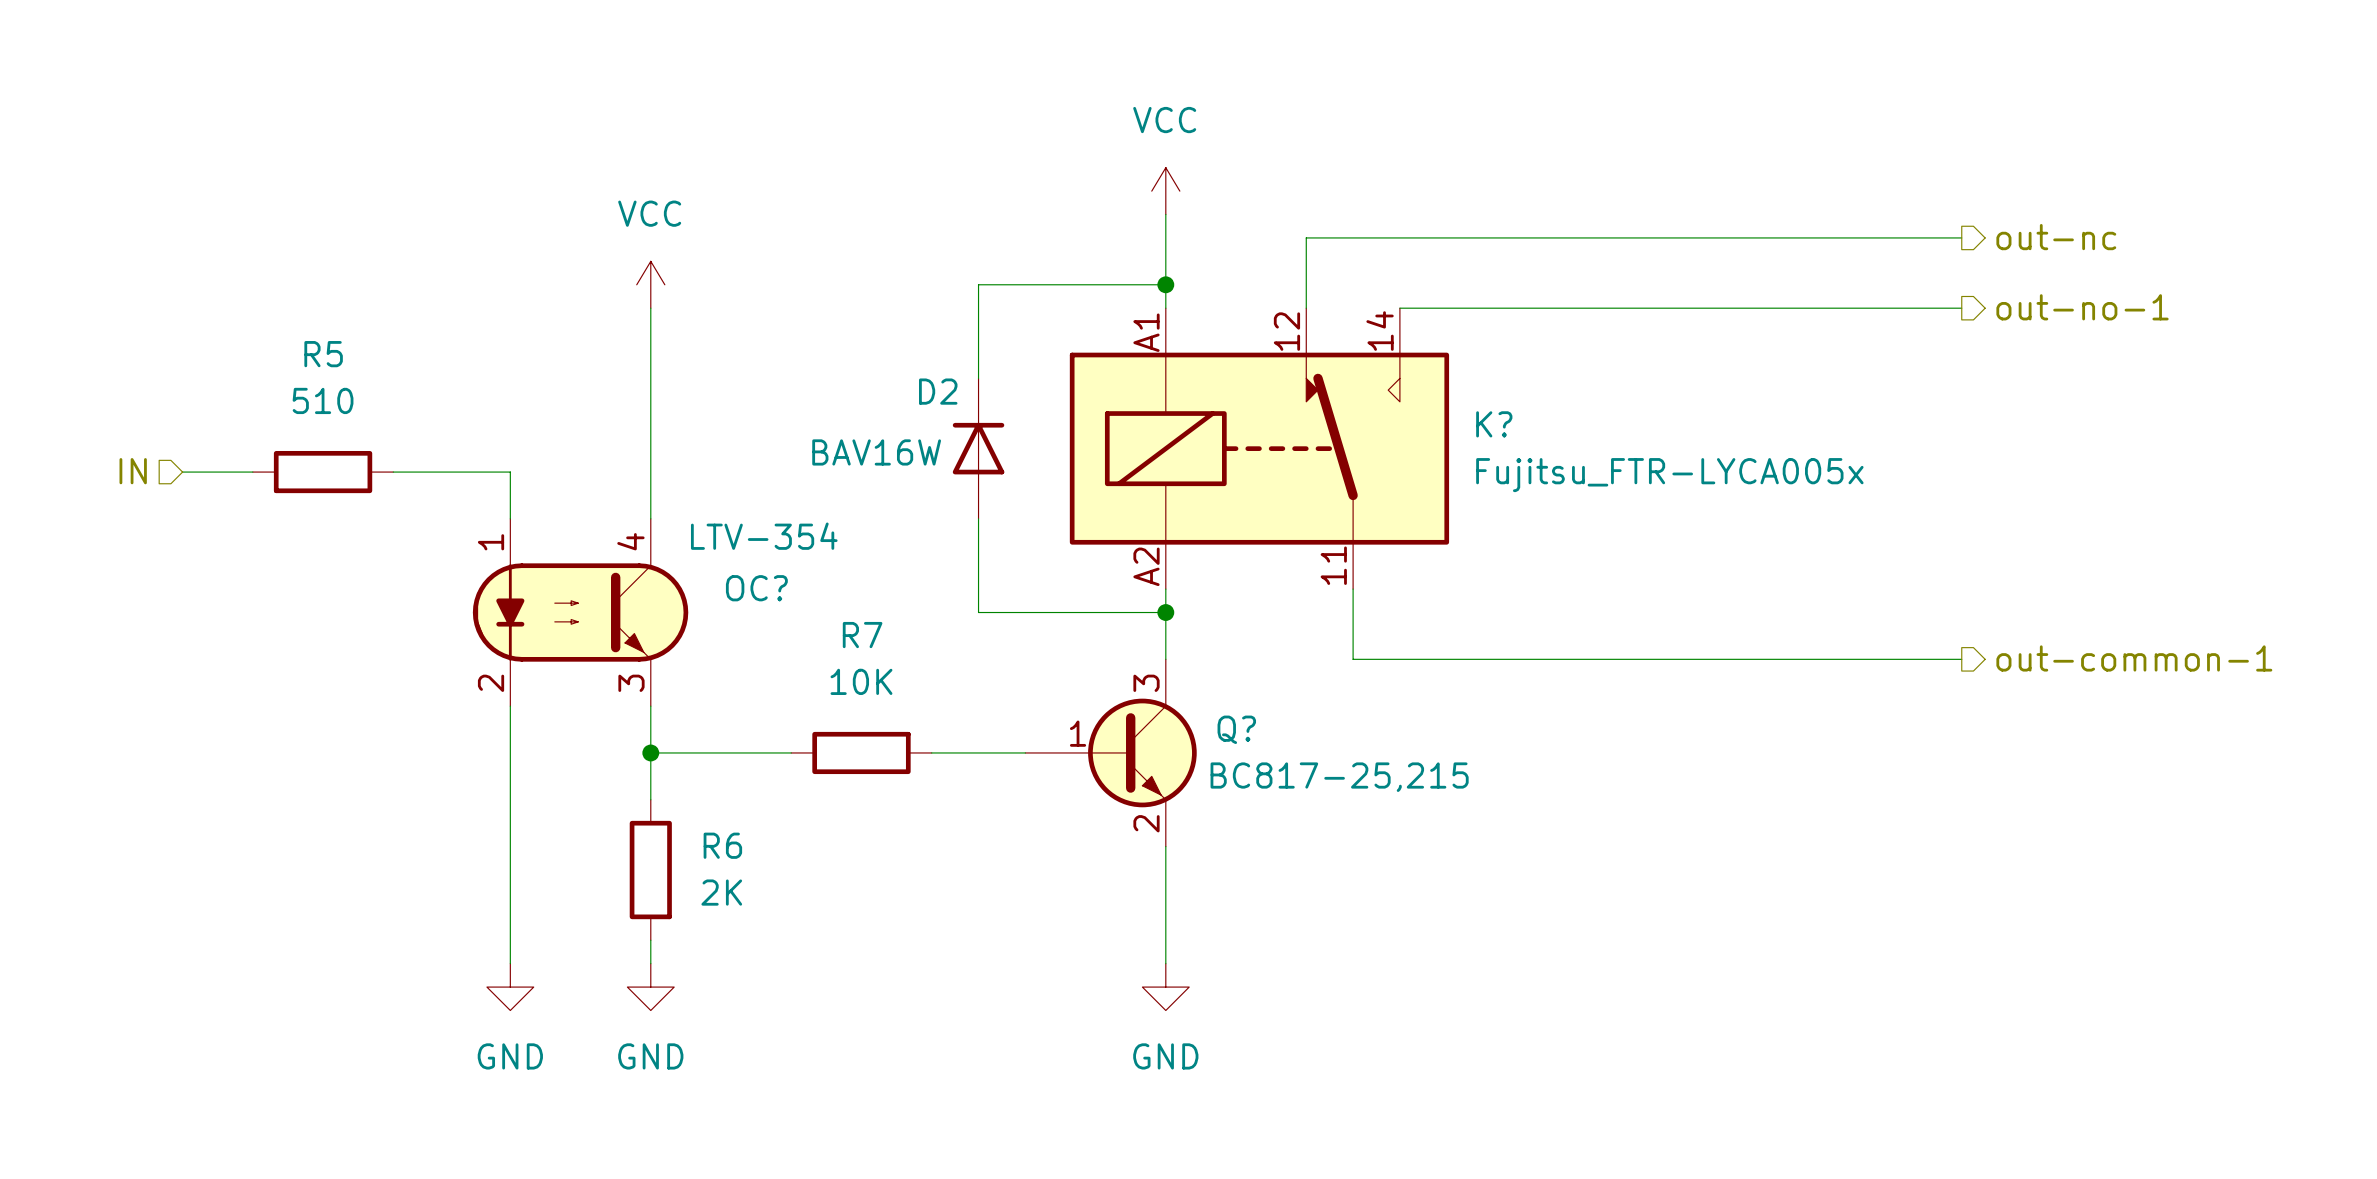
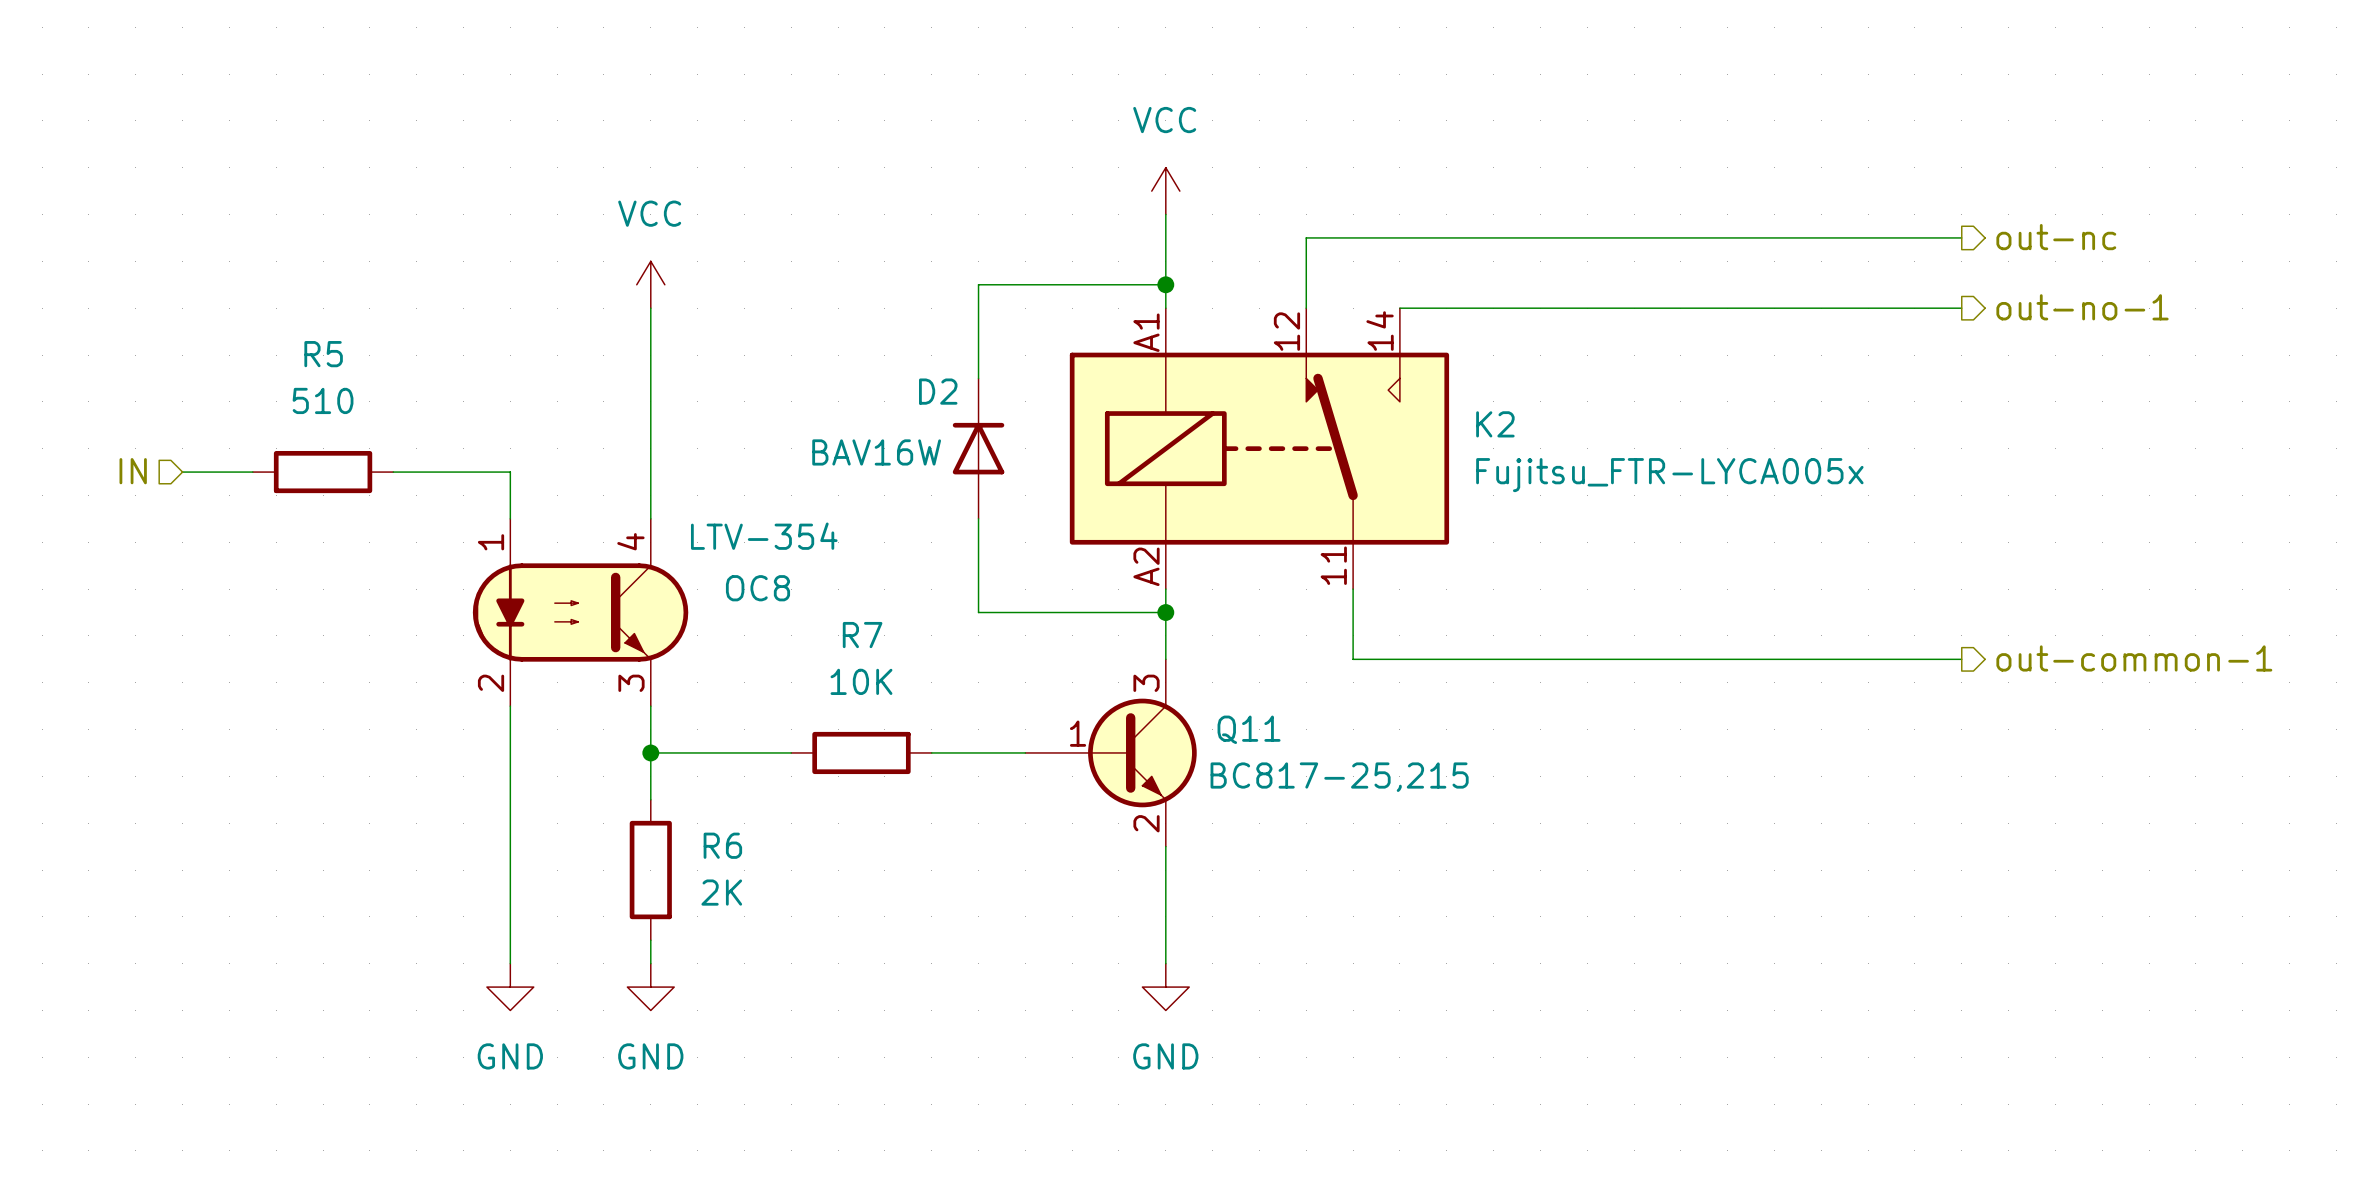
K? name: K? (1494, 424) -> K2 (1495, 424)
OC? name: OC? (756, 588) -> OC8 (757, 588)
Q? name: Q? (1236, 729) -> Q11 (1249, 729)

